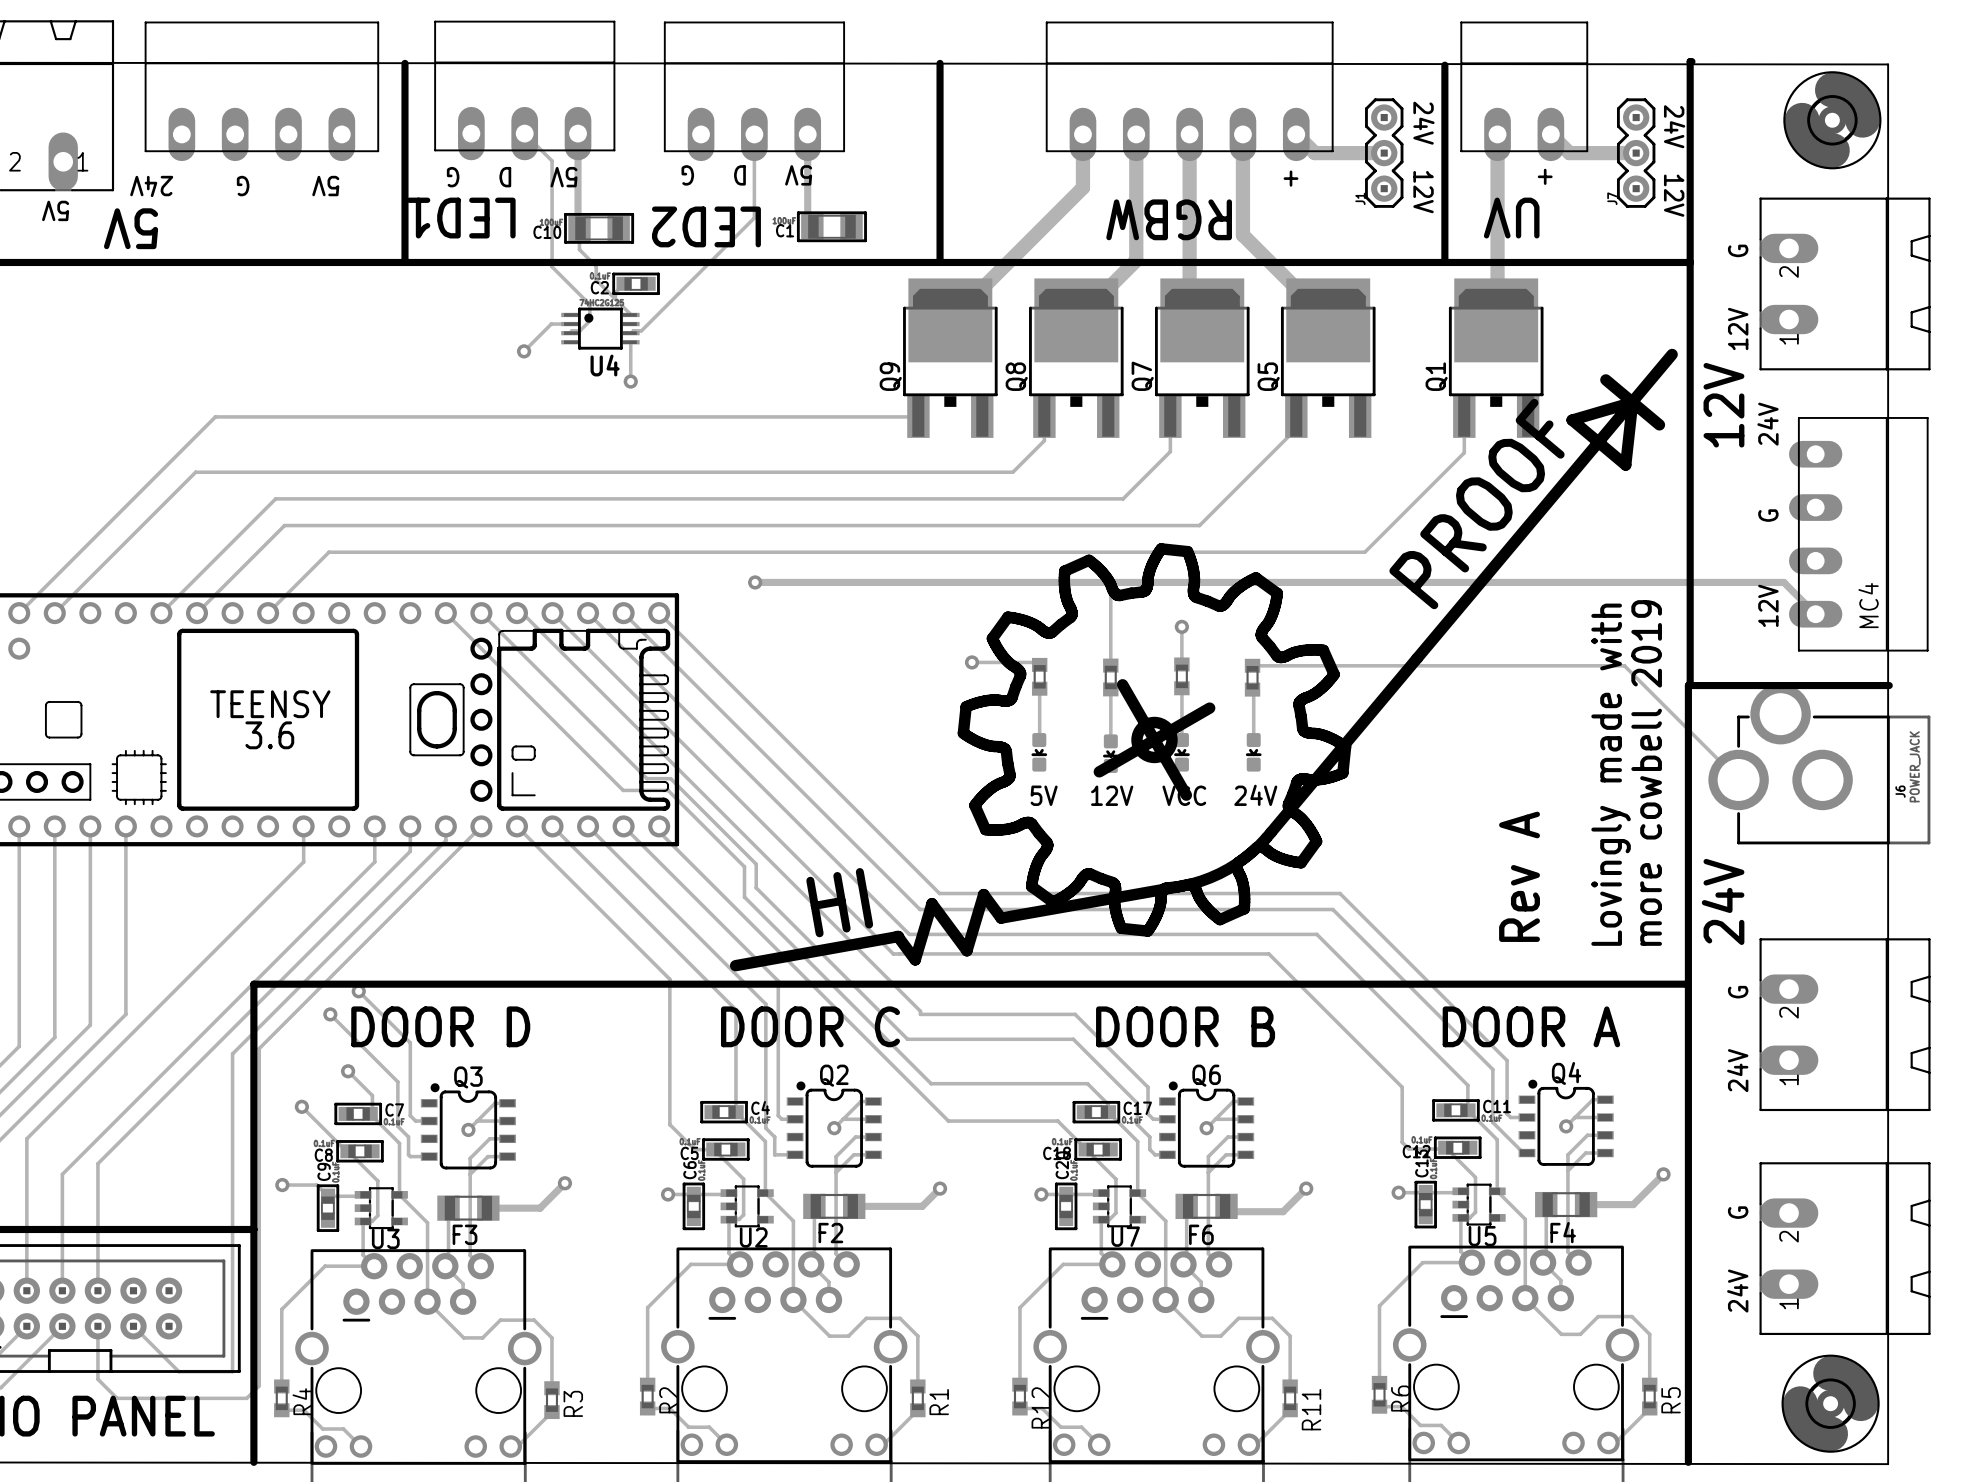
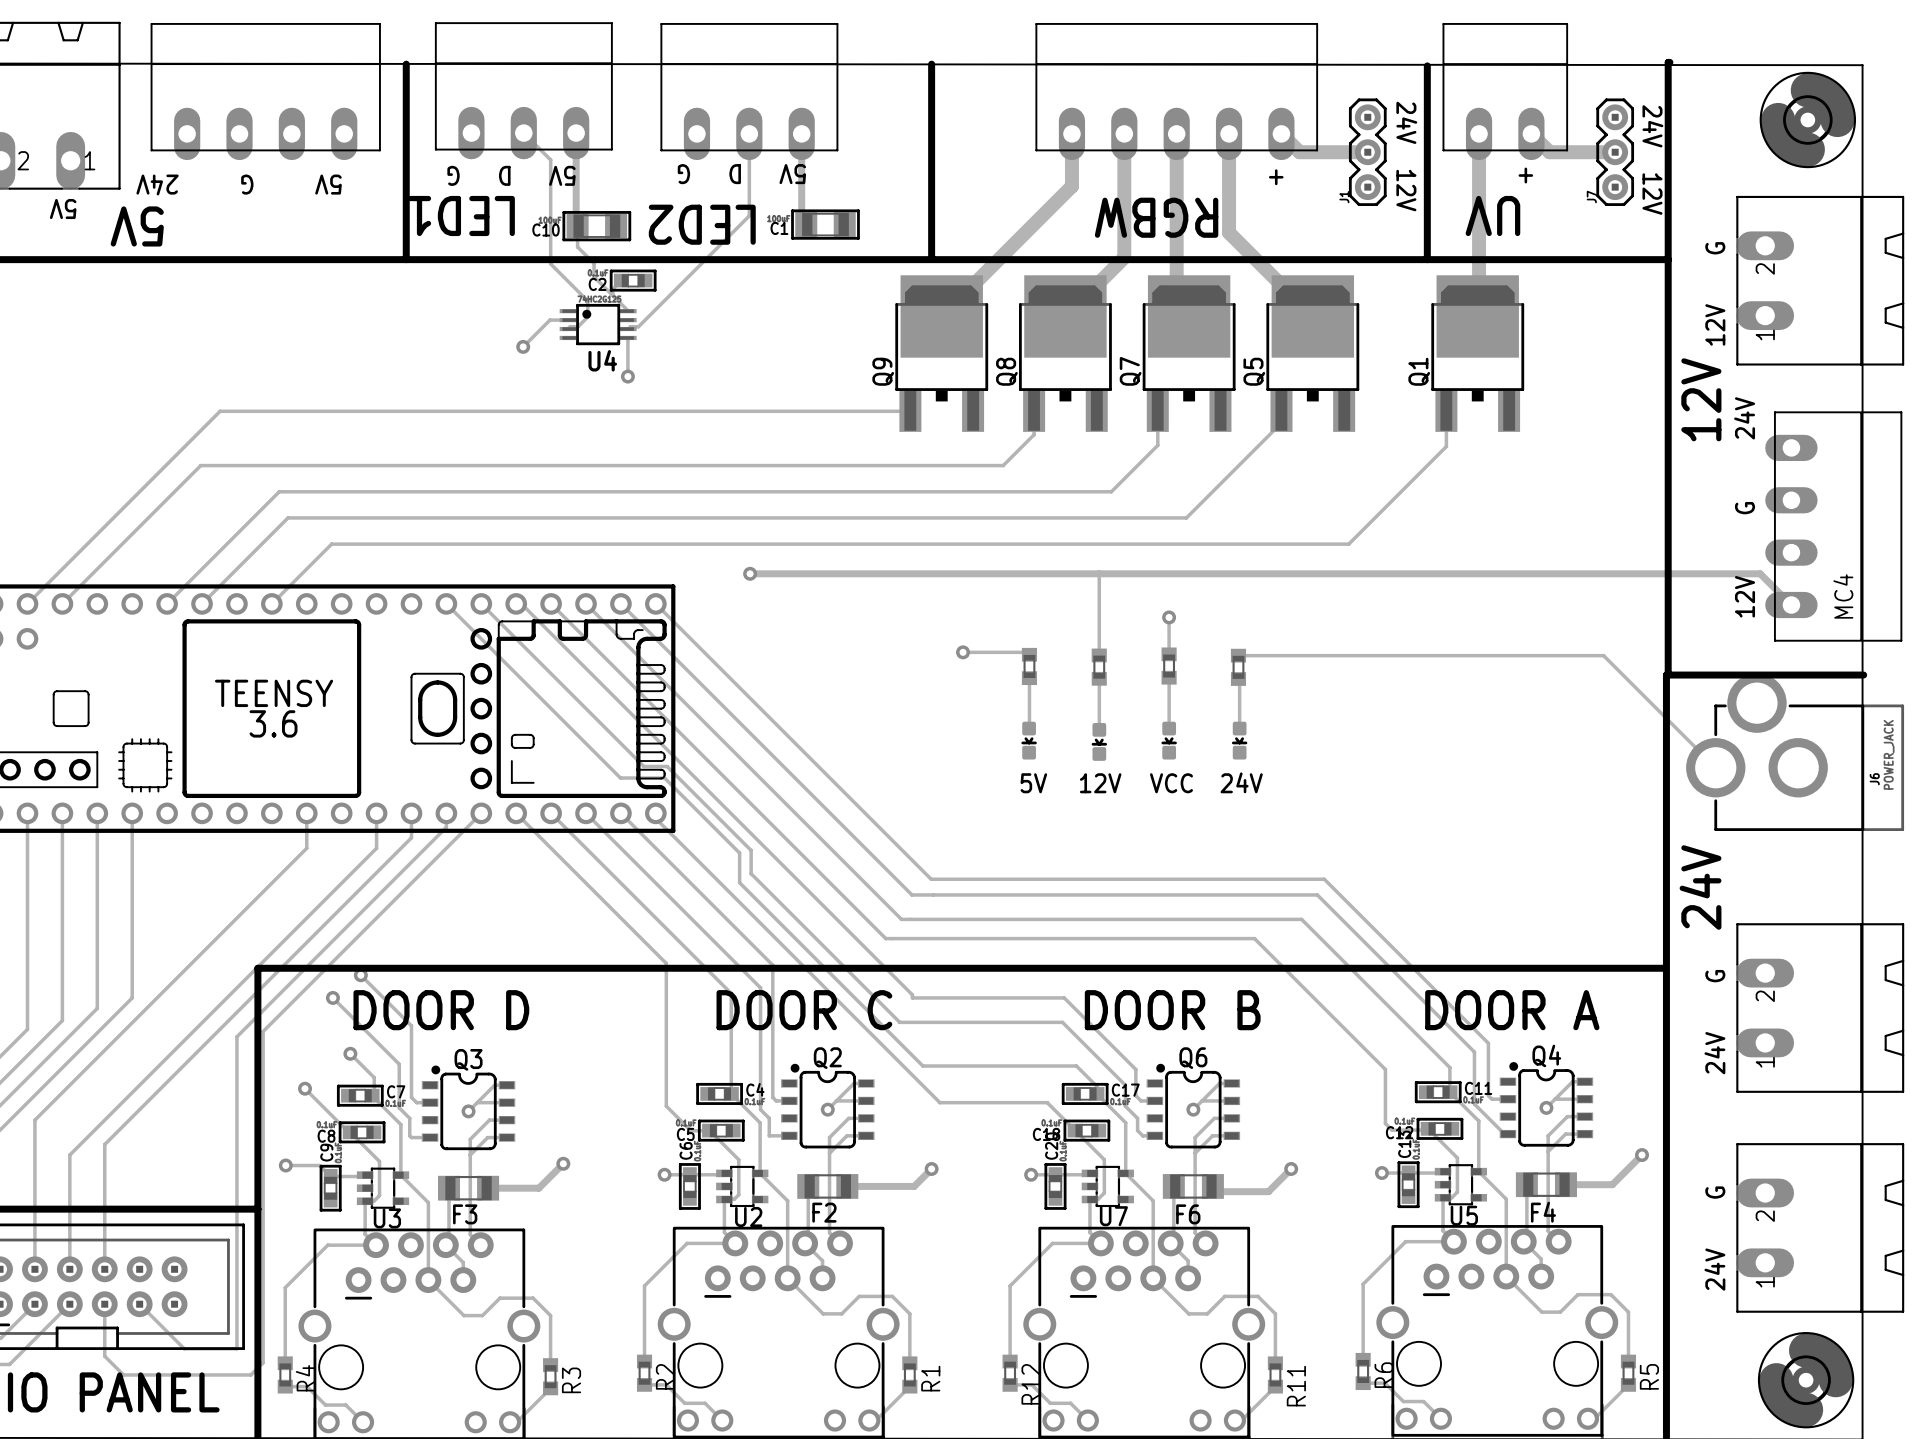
line: (1672, 354) (1266, 837) (1244, 858) (1219, 873) (1191, 883) (1001, 918) (983, 894) (966, 950) (931, 903) (915, 959) (897, 936) -> none
line: (1605, 379) (1659, 424) -> none
line: (1632, 402) (1625, 465) (1572, 420) (1632, 402) -> none
text: PROOF (1477, 504) -> none
line: (1161, 548) (1151, 565) (1147, 587) (1142, 591) (1116, 594) (1105, 575) (1089, 560) (1064, 571) (1065, 593) (1071, 614) (1050, 633) (1029, 622) (1007, 617) (992, 638) (1002, 655) (1018, 670) (1020, 675) (1009, 700) (987, 700) (966, 706) (963, 733) (980, 742) (1001, 747) (1006, 751) (1009, 777) (990, 789) (974, 805) (985, 829) (1008, 829) (1029, 822) (1047, 844) (1036, 864) (1031, 886) (1053, 902) (1069, 892) (1084, 875) (1090, 874) (1114, 884) (1115, 906) (1121, 928) (1147, 931) (1157, 914) (1161, 892) (1166, 888) (1192, 885) (1203, 904) (1219, 919) (1244, 908) (1243, 886) (1237, 865) (1258, 846) (1279, 857) (1301, 862) (1316, 841) (1304, 822) (1288, 807) (1296, 782) (1302, 778) (1324, 778) (1342, 773) (1345, 746) (1325, 736) (1303, 730) (1299, 702) (1318, 690) (1334, 674) (1323, 650) (1300, 650) (1279, 657) (1262, 637) (1262, 631) (1273, 612) (1277, 593) (1255, 577) (1236, 589) (1221, 605) (1196, 597) (1193, 592) (1193, 570) (1187, 551) (1161, 548) -> none
line: (1122, 684) (1186, 795) -> none
line: (1209, 708) (1099, 771) -> none
drawing: [1131, 716, 1178, 764] -> none
text: more cowbell 2019 (1646, 773) -> none
text: Lovingly made with (1611, 774) -> none
text: Rev A (1519, 876) -> none
text: HI (839, 902) -> none
line: (898, 936) (735, 965) -> none

